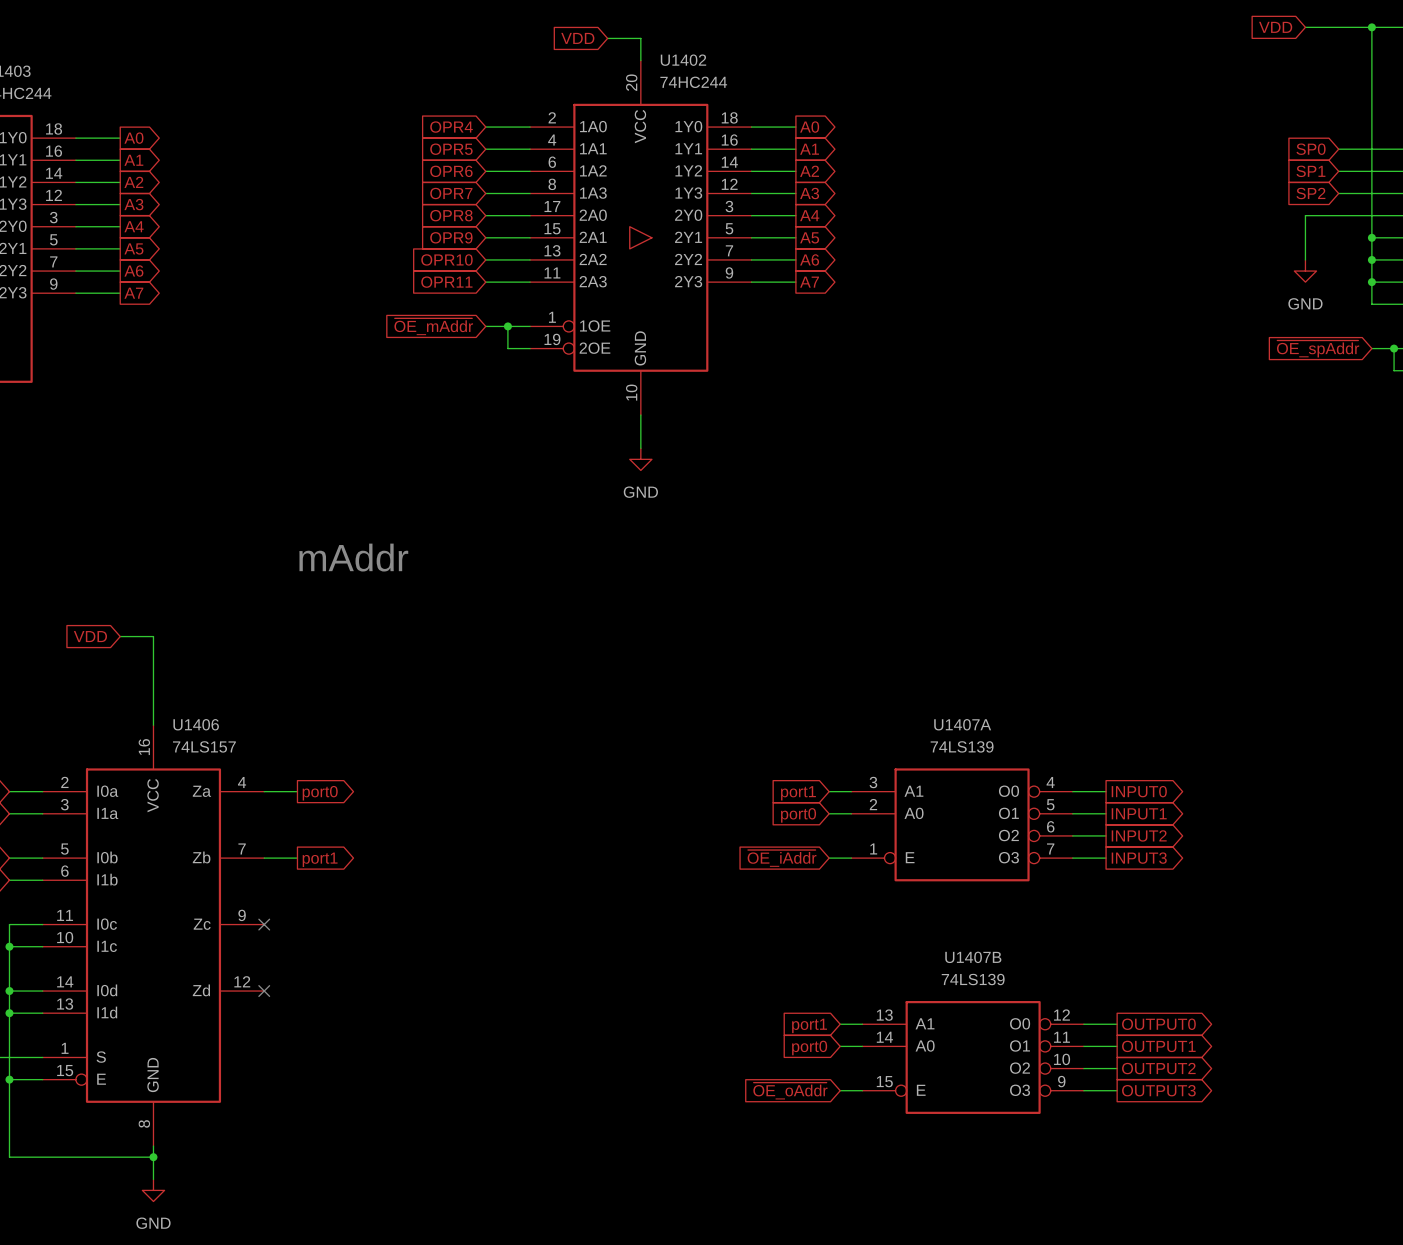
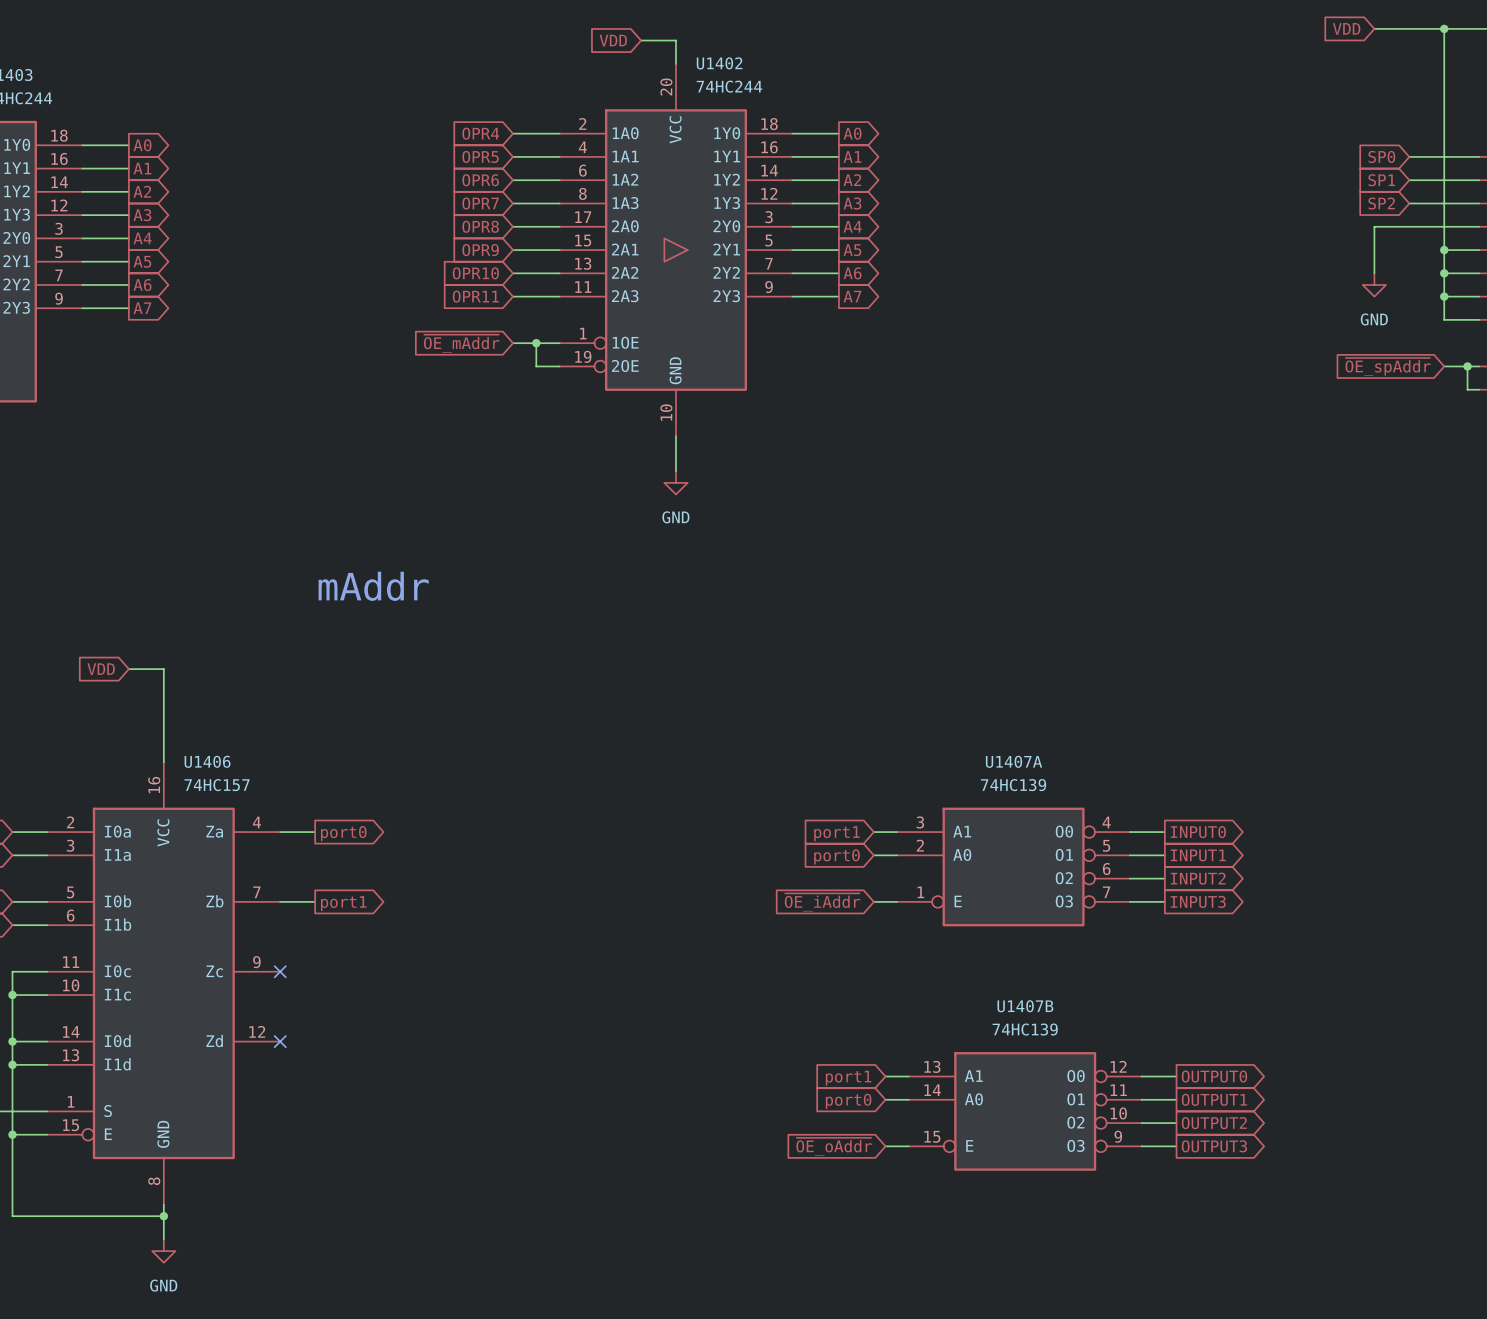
U1406 value: 74LS157 (204, 746) -> 74HC157 (217, 785)
U1407A value: 74LS139 (962, 746) -> 74HC139 (1013, 785)
U1407B value: 74LS139 (973, 979) -> 74HC139 (1025, 1029)

